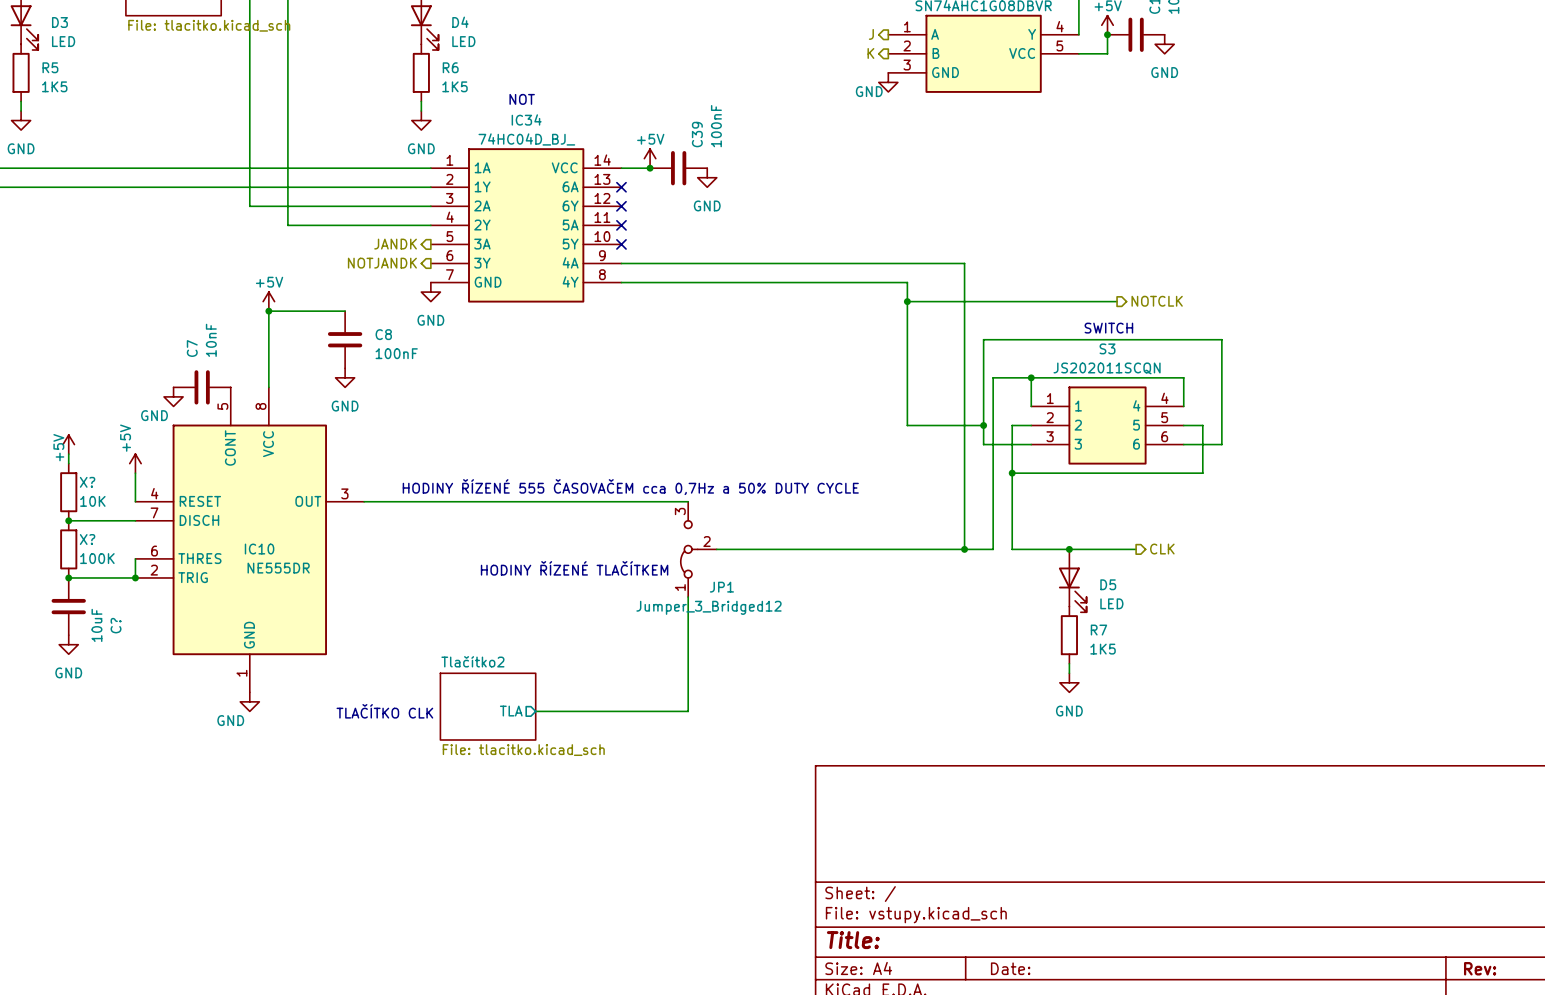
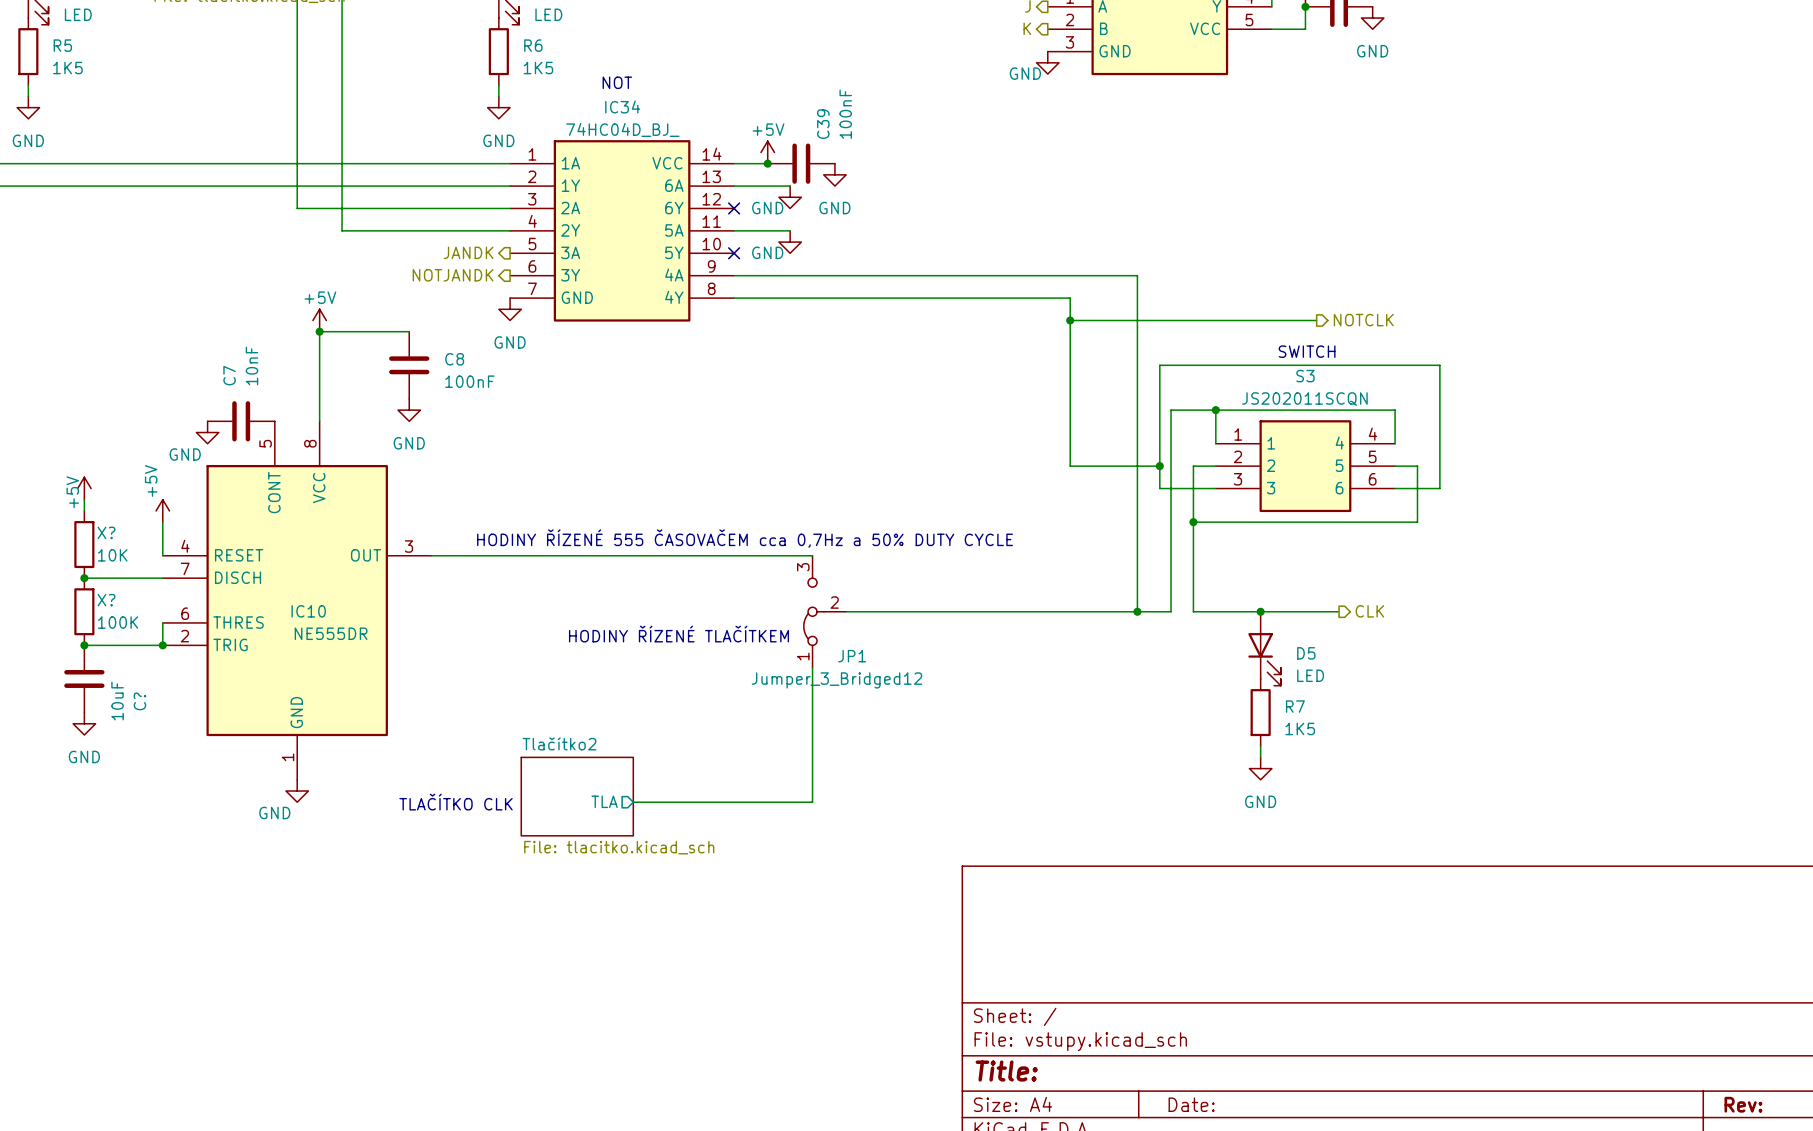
wire: none -> (734, 186) (790, 186)
no-connect mark: (621, 187) -> none
power symbol: none -> GND (790, 197)
wire: none -> (734, 230) (790, 230)
no-connect mark: (621, 225) -> none
power symbol: none -> GND (790, 242)

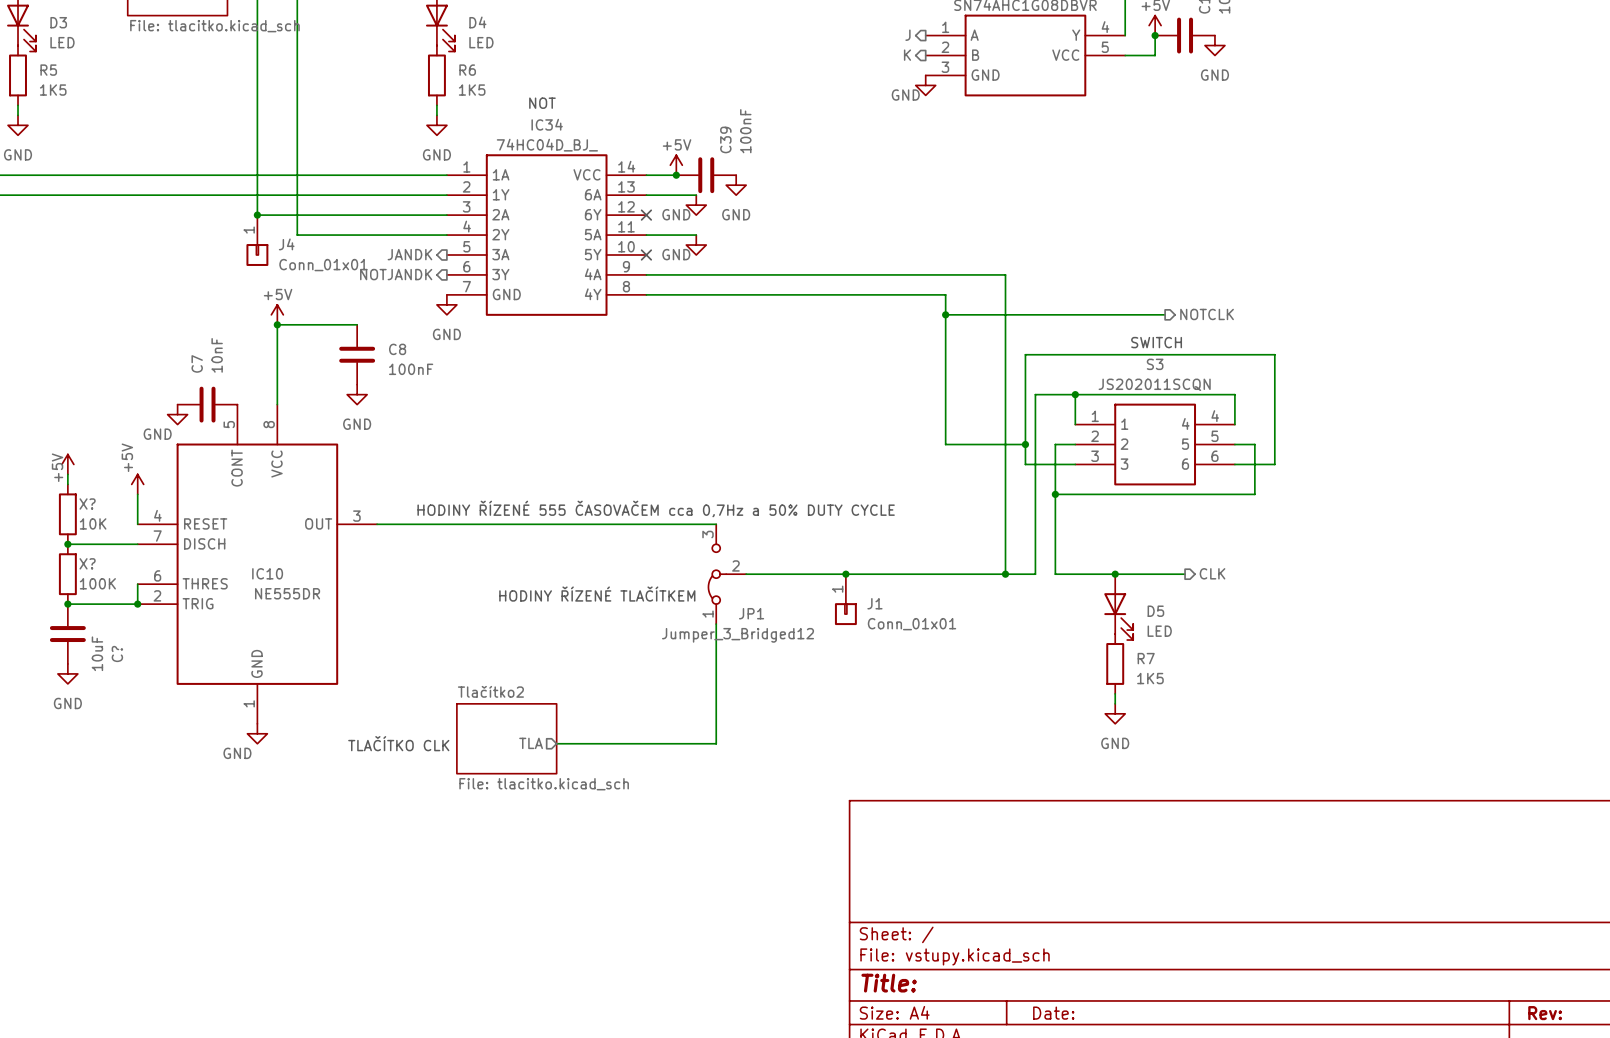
junction: none -> (257, 215)
J4: none -> Conn_01x01 (257, 240)
junction: none -> (845, 574)
J1: none -> Conn_01x01 (845, 599)

